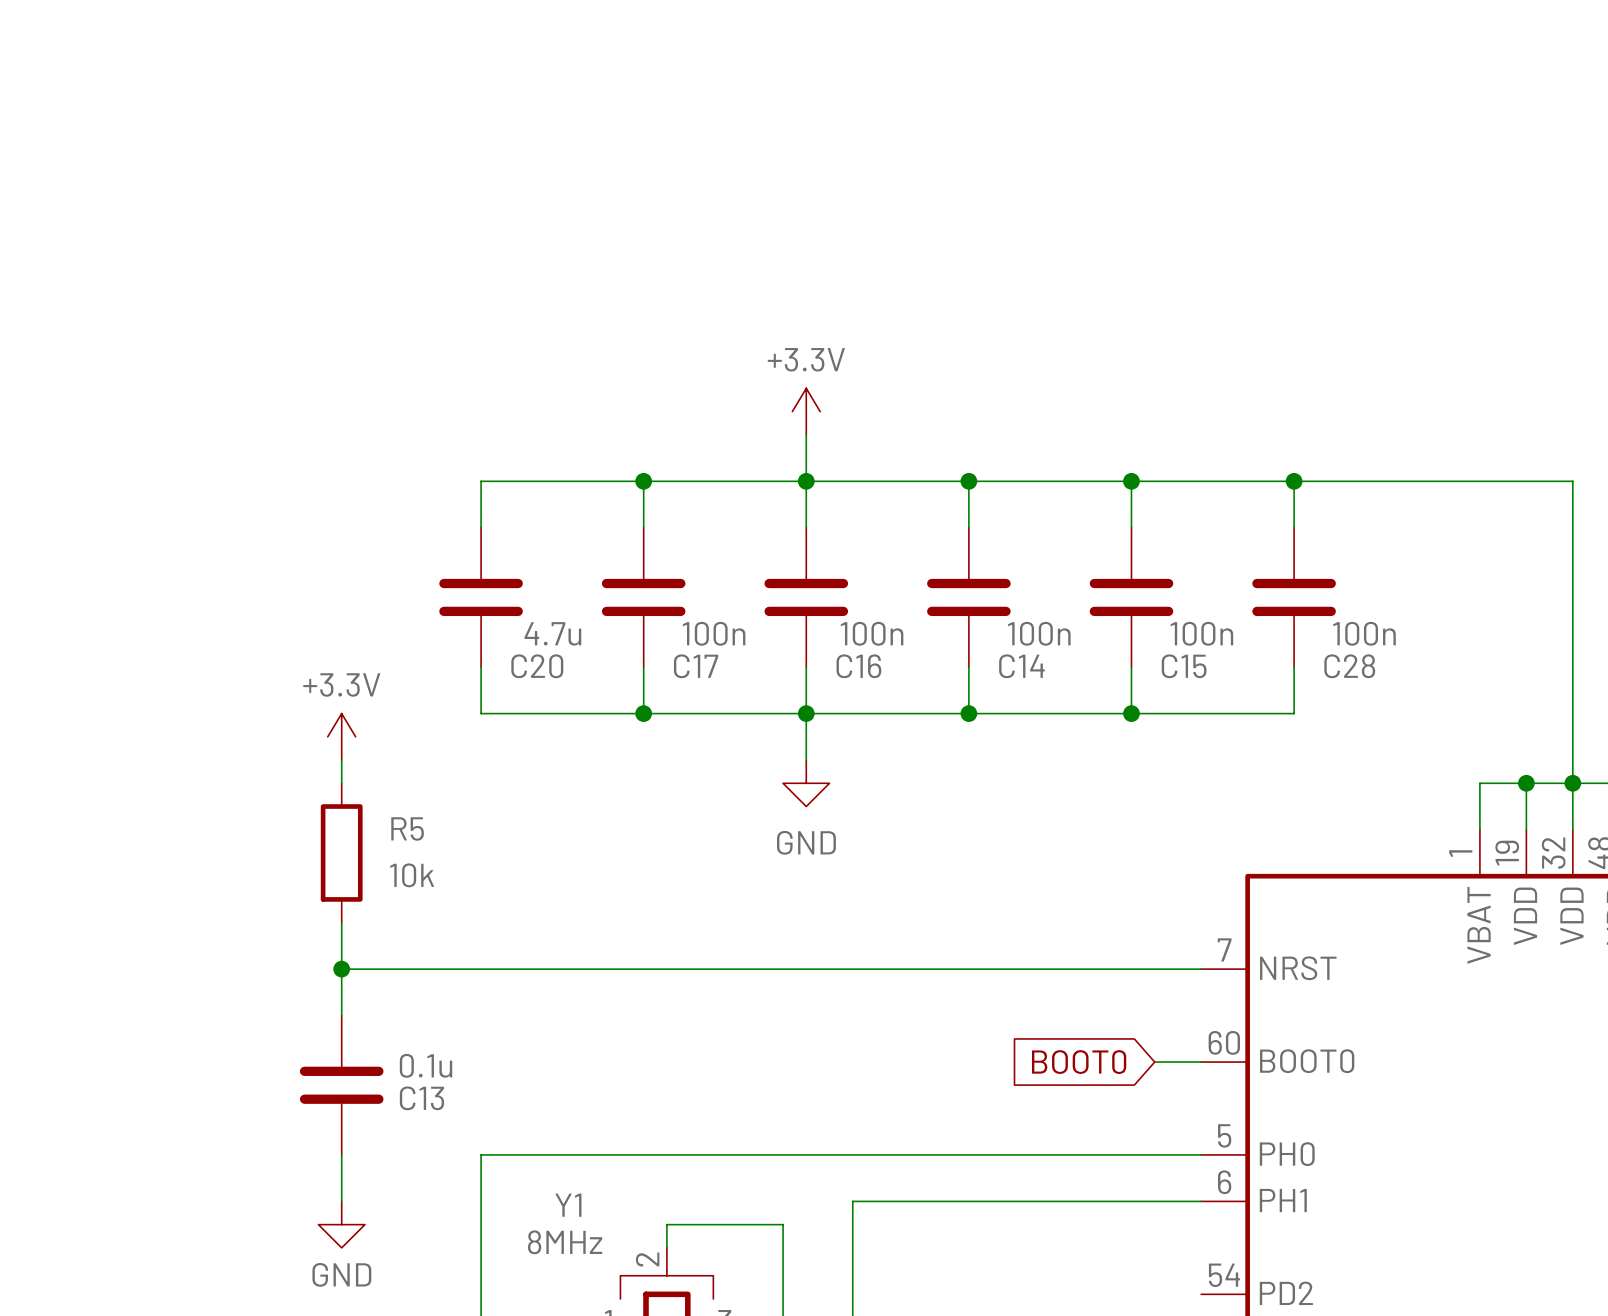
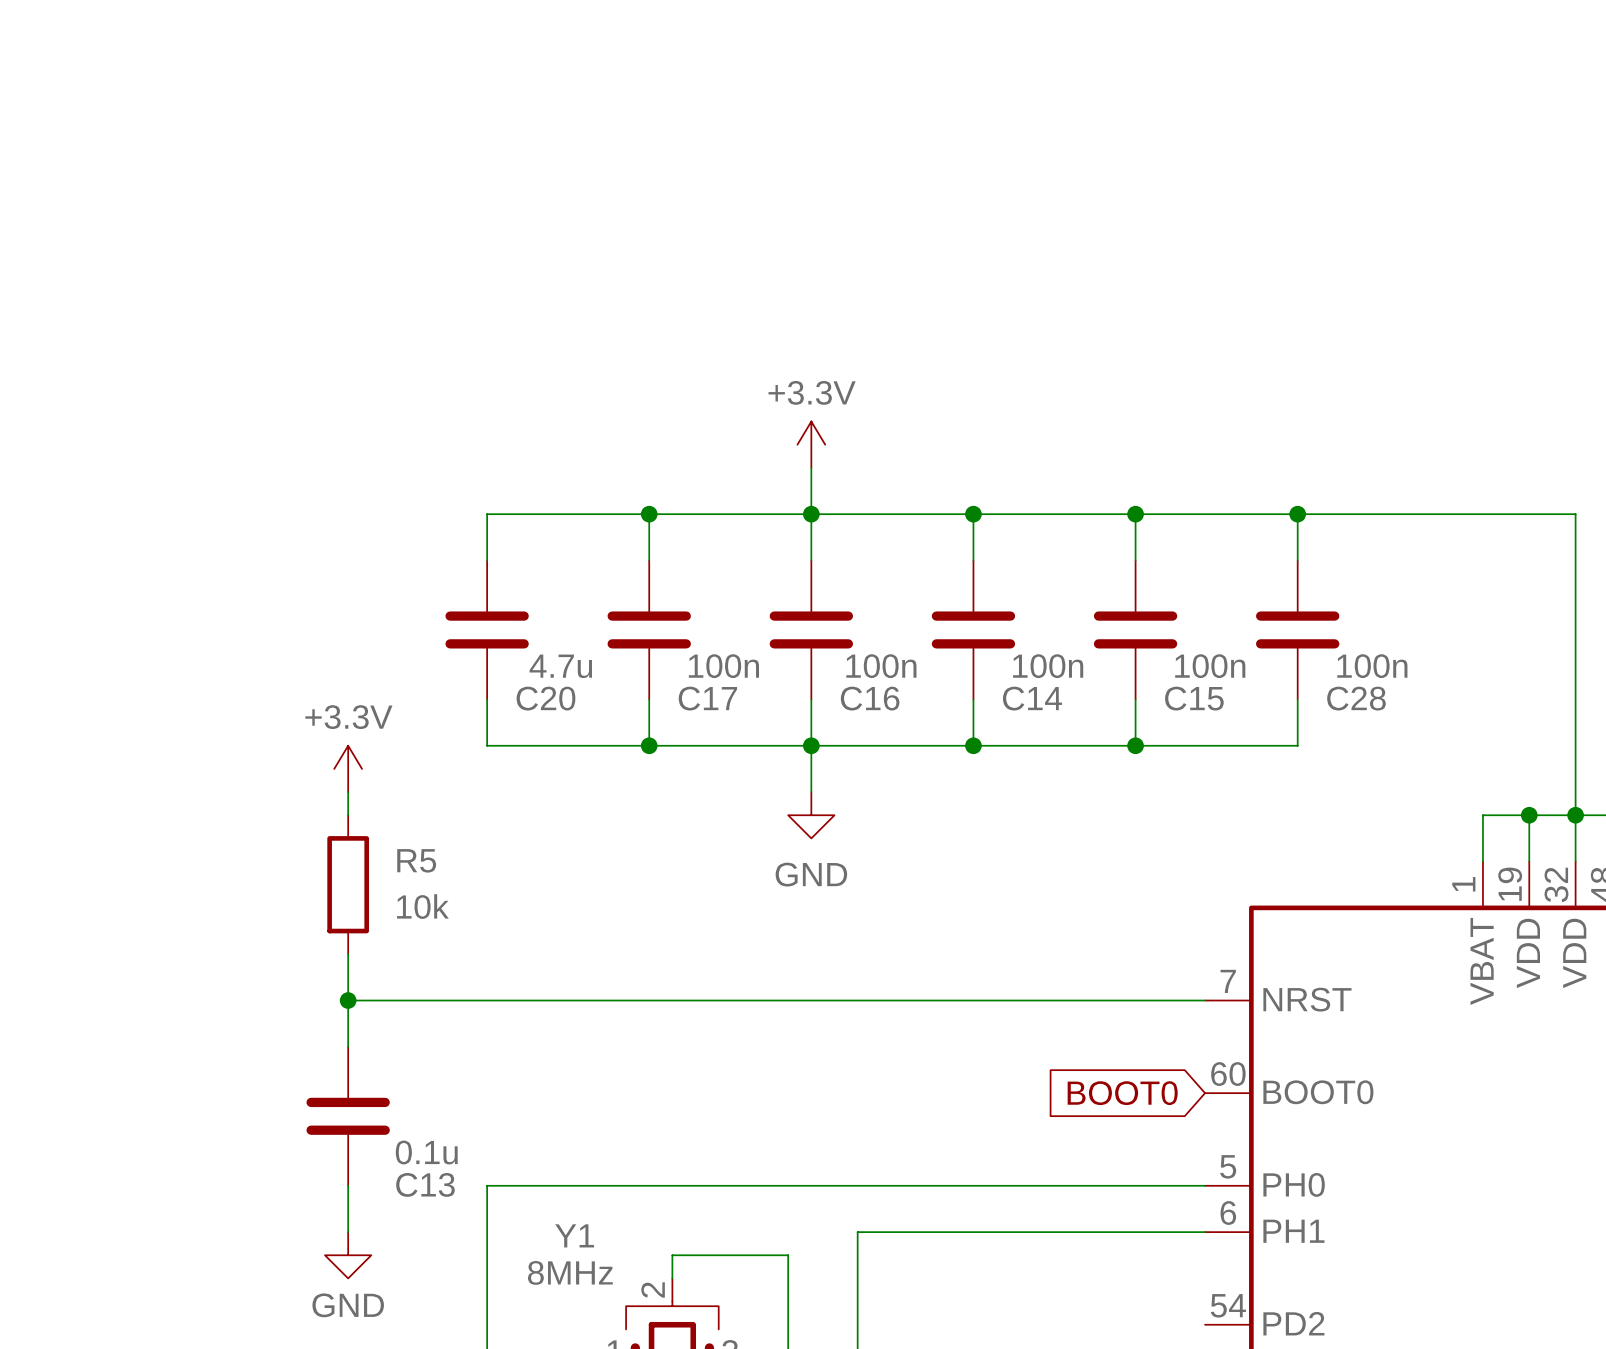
global label position: BOOT0 (1079, 1062) -> BOOT0 (1122, 1093)
wire: (1154, 1062) (1201, 1062) -> none
C13 value position: 0.1u (426, 1065) -> 0.1u (426, 1152)
C13 name position: C13 (421, 1098) -> C13 (425, 1184)

